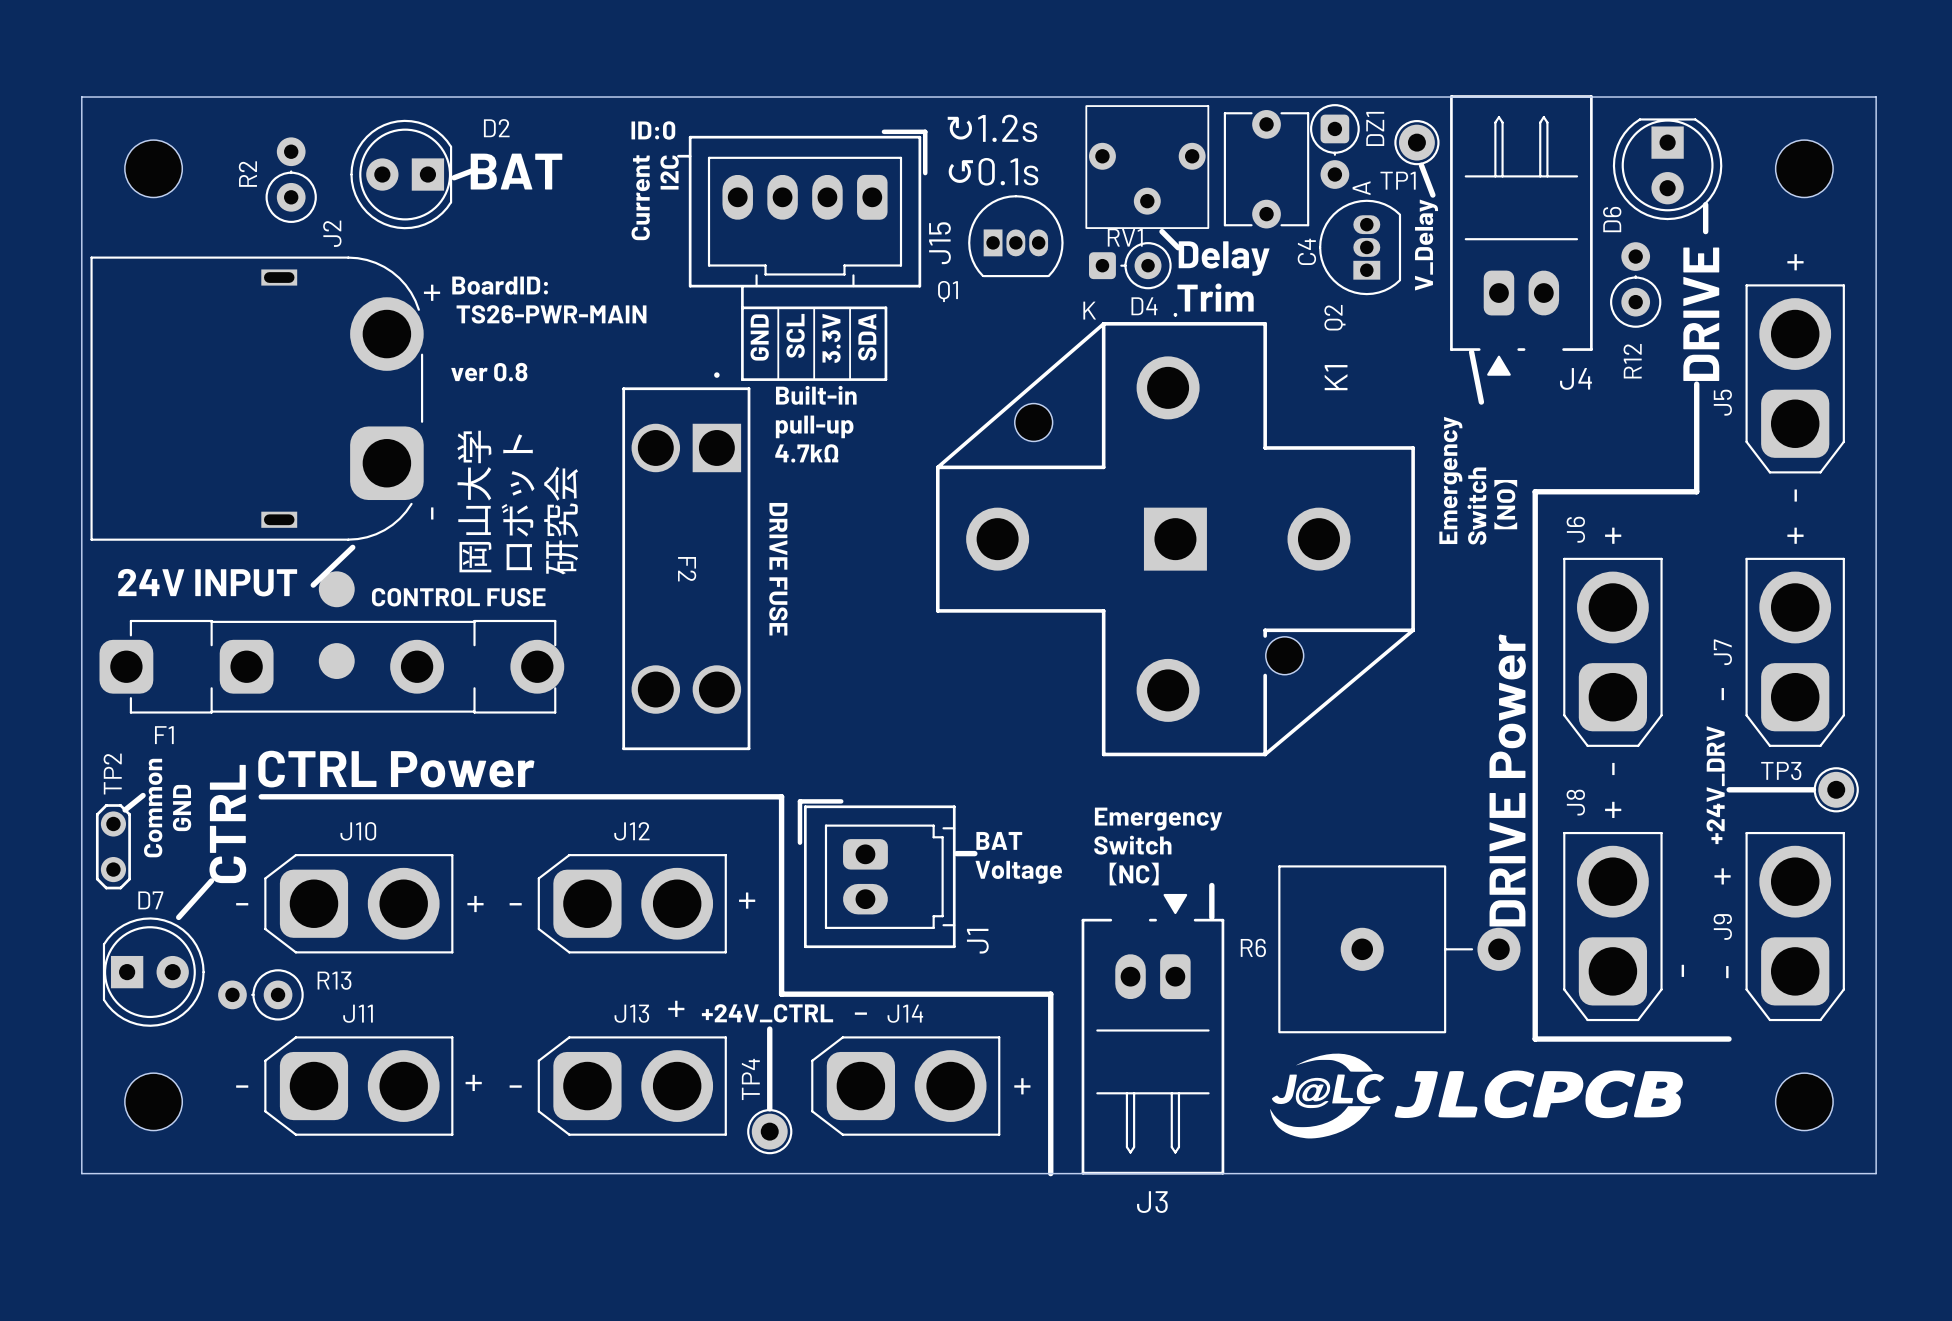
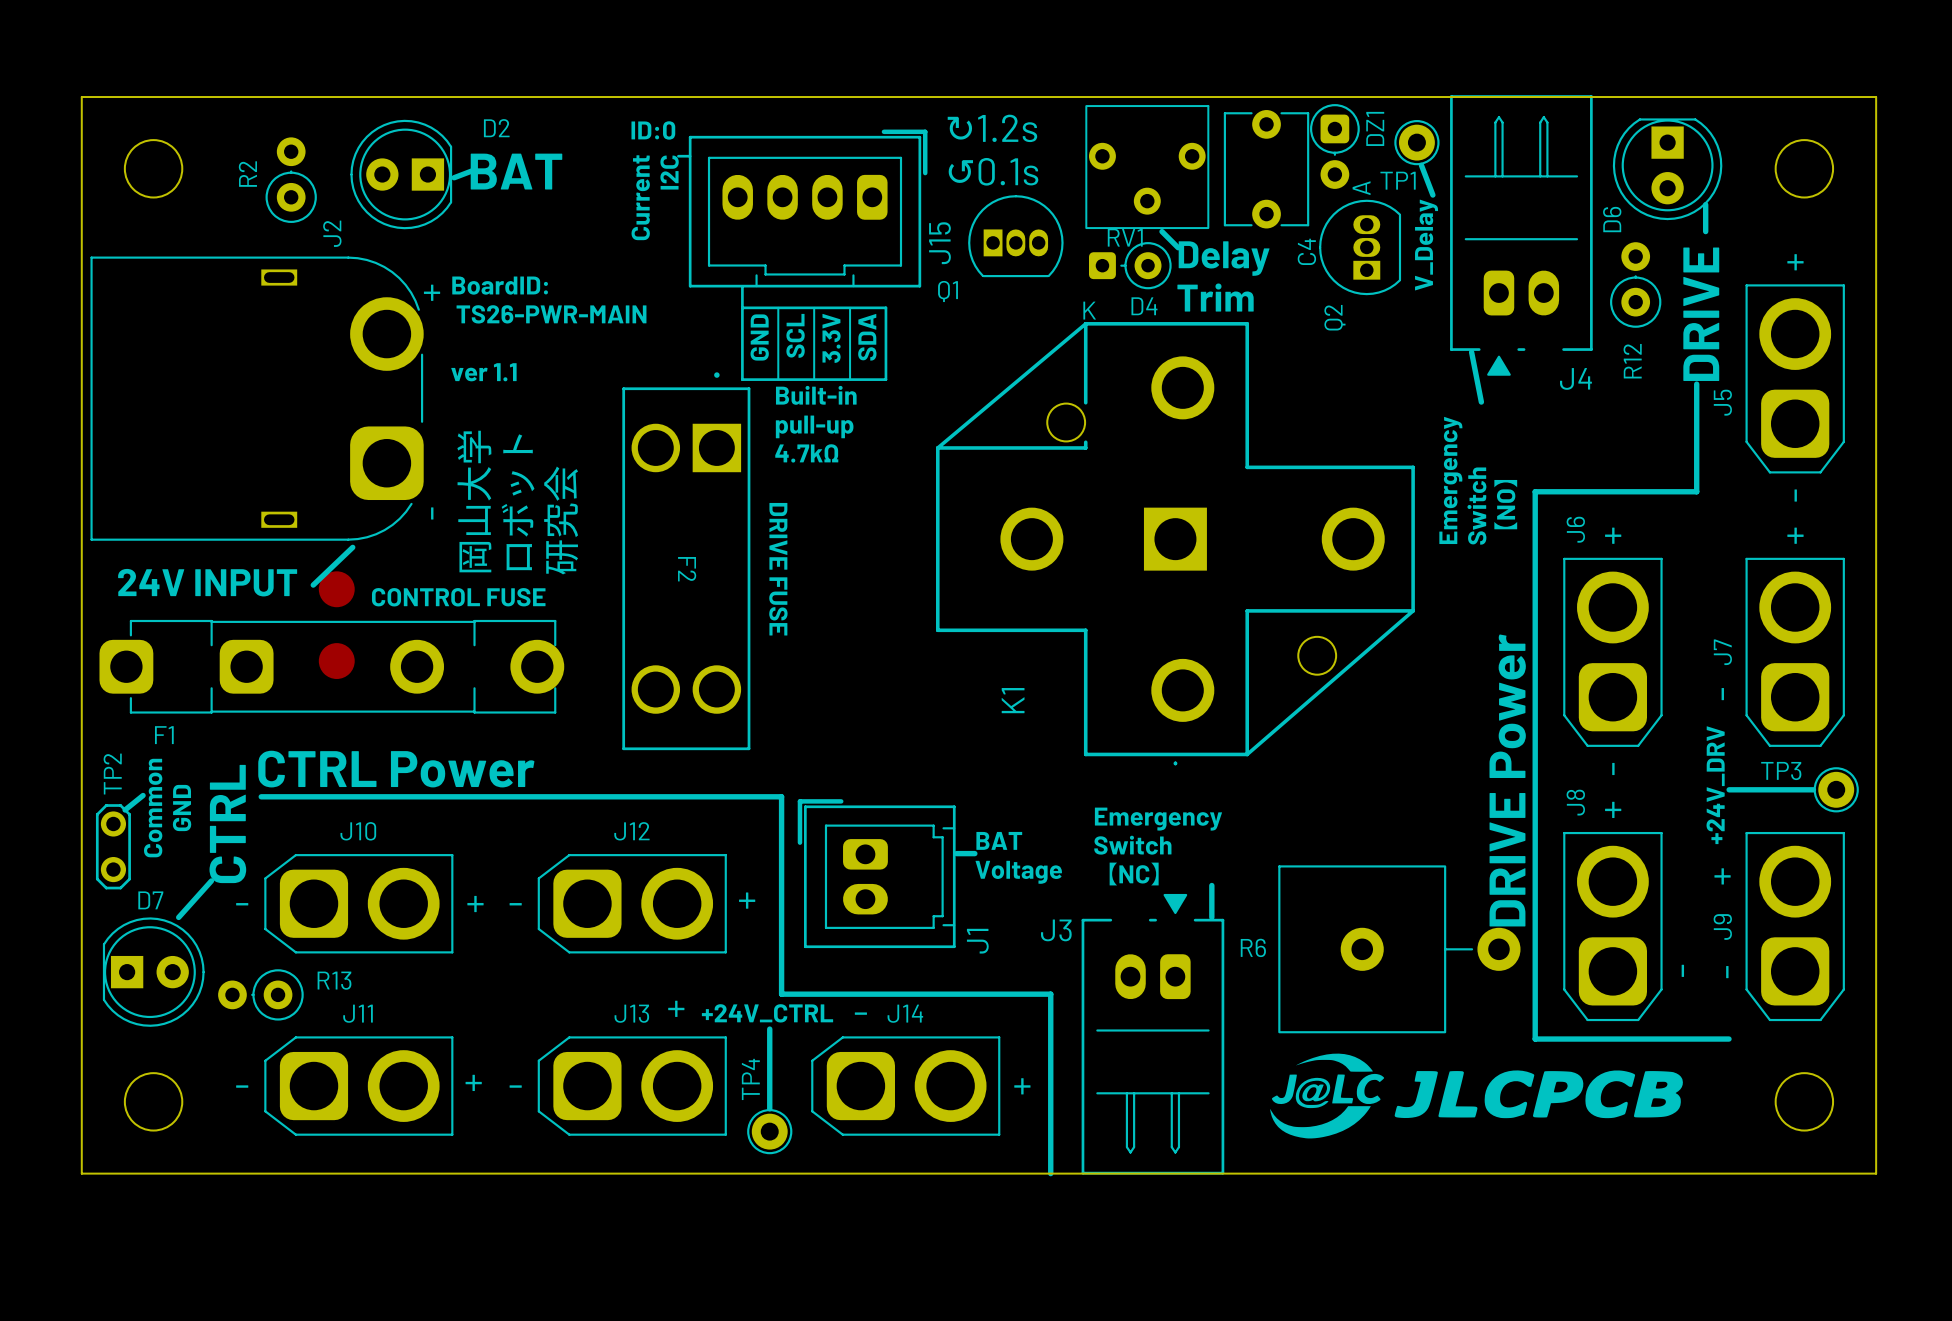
text: ver 0.8 (489, 372) -> ver 1.1 (483, 372)
K1 rotation: 0° (1175, 534) -> 180° (1175, 543)
J3 name position: J3 (1152, 1202) -> J3 (1056, 930)

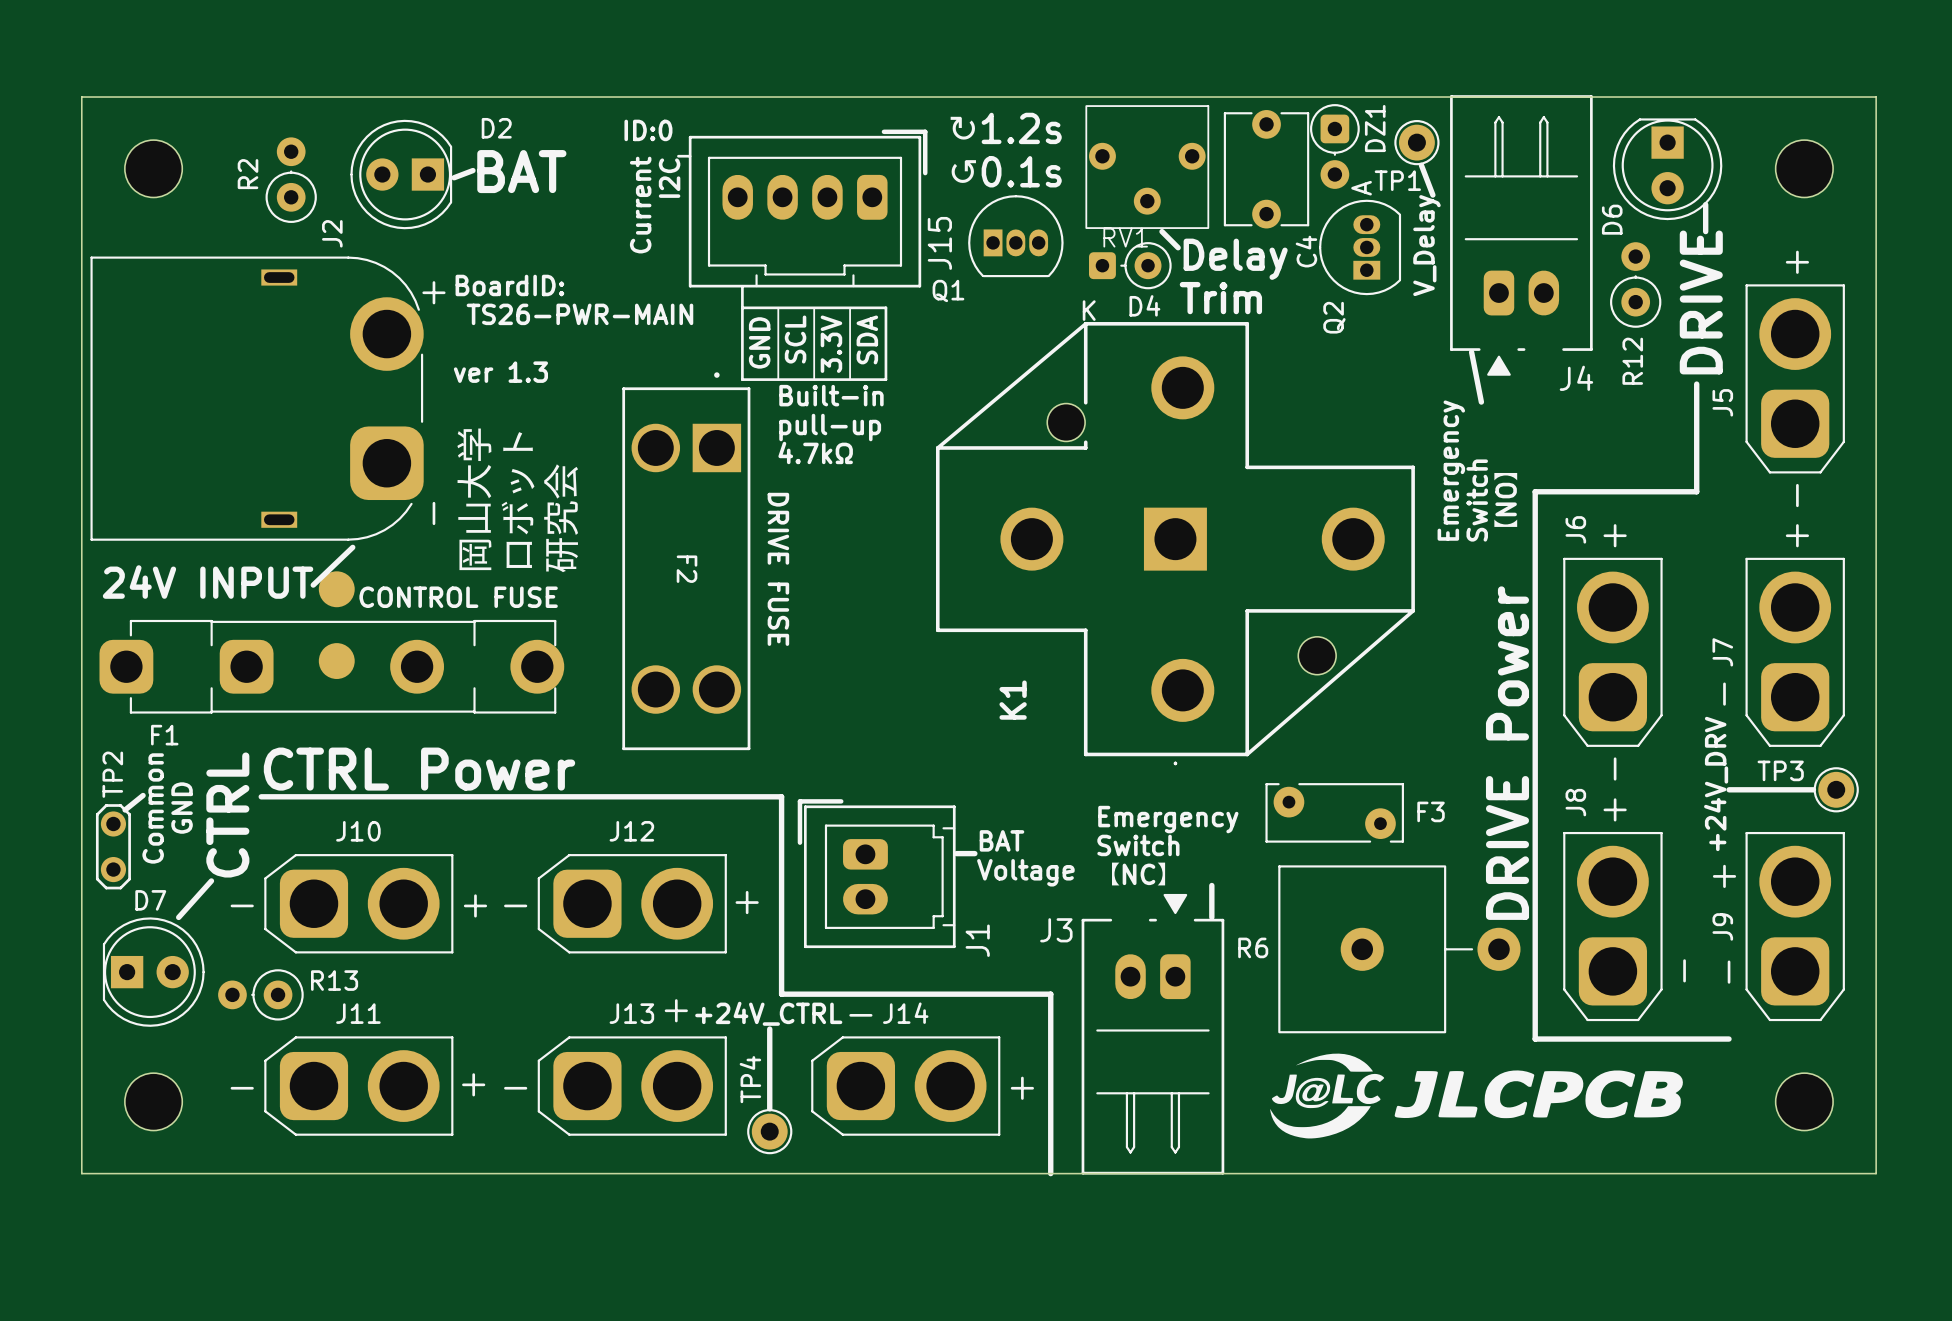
text: ver 1.1 (483, 372) -> ver 1.3 (500, 372)
F3: none -> (1334, 812)

